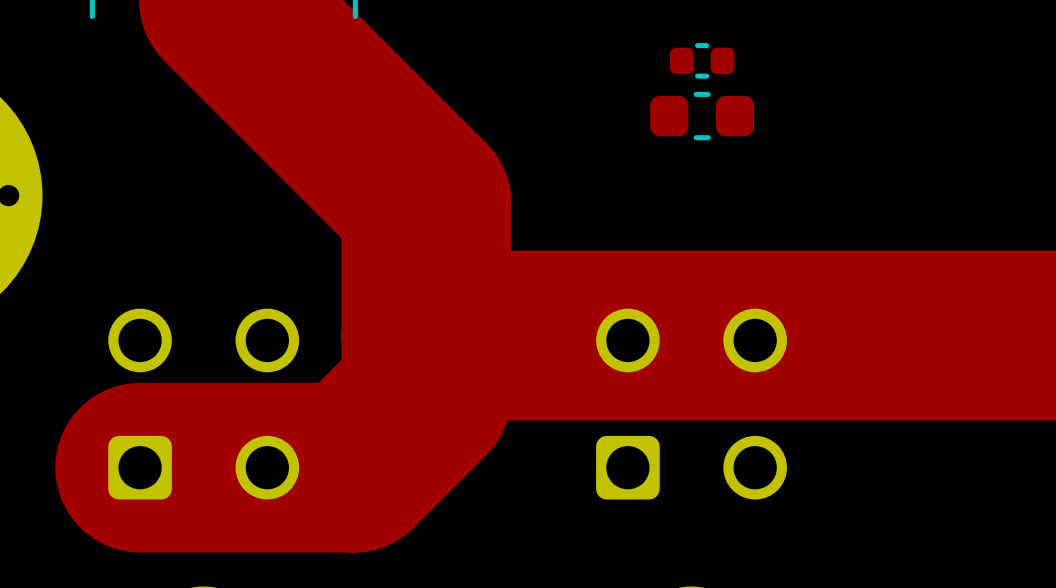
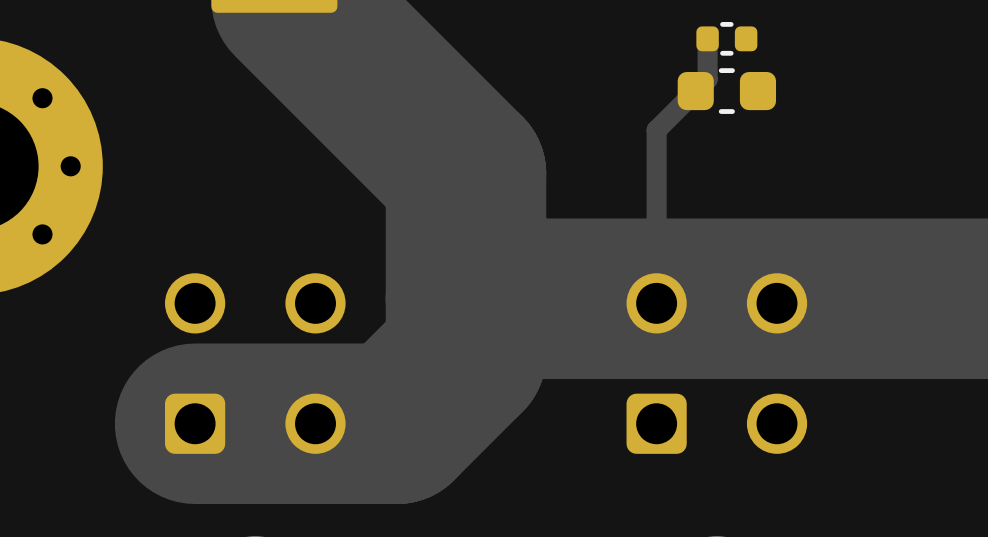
track: none -> (707, 38) (707, 79) (656, 130) (656, 303)

